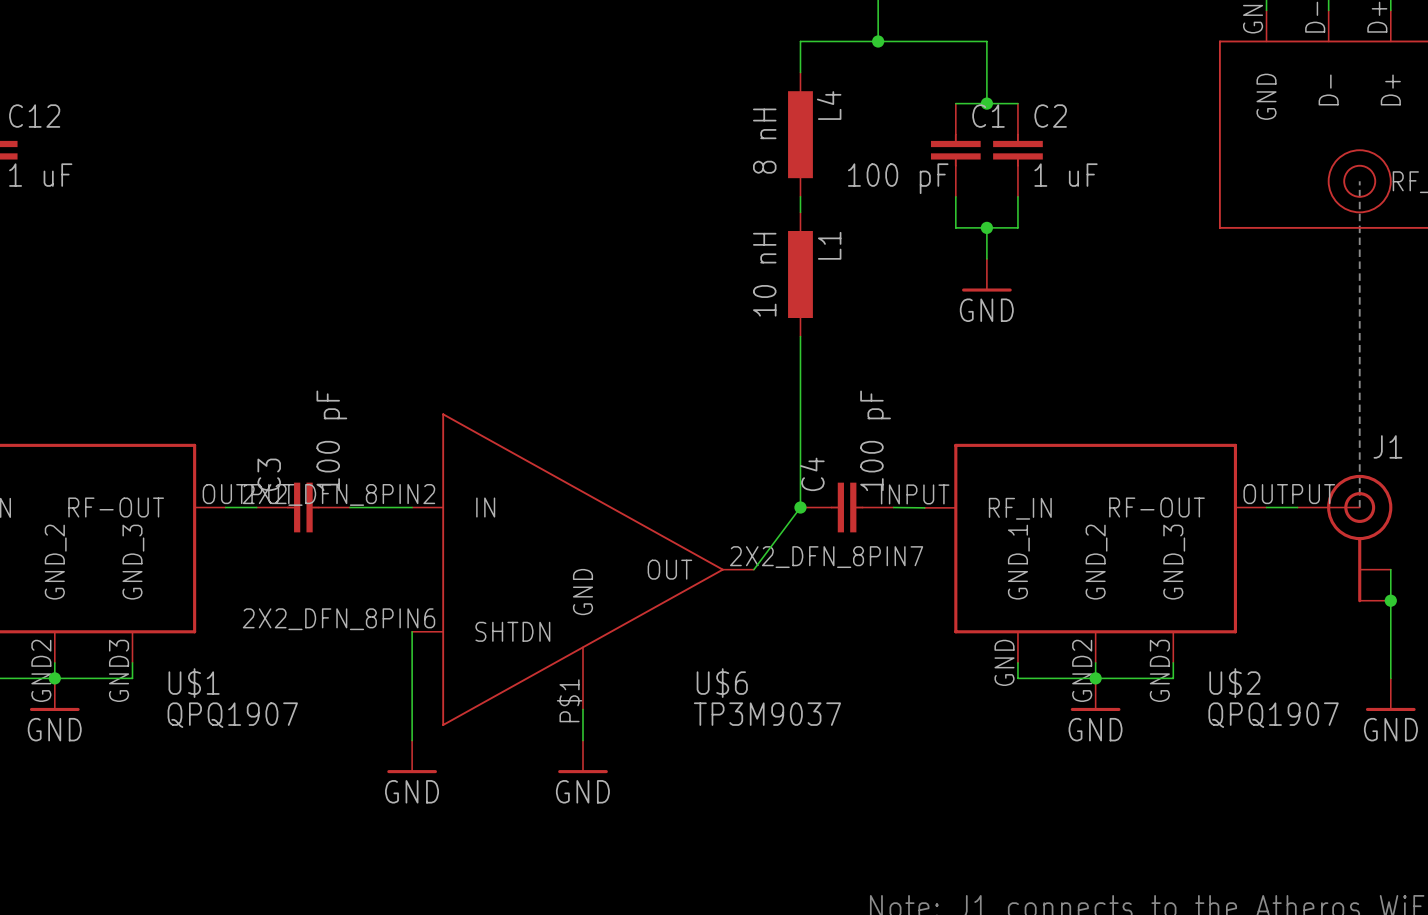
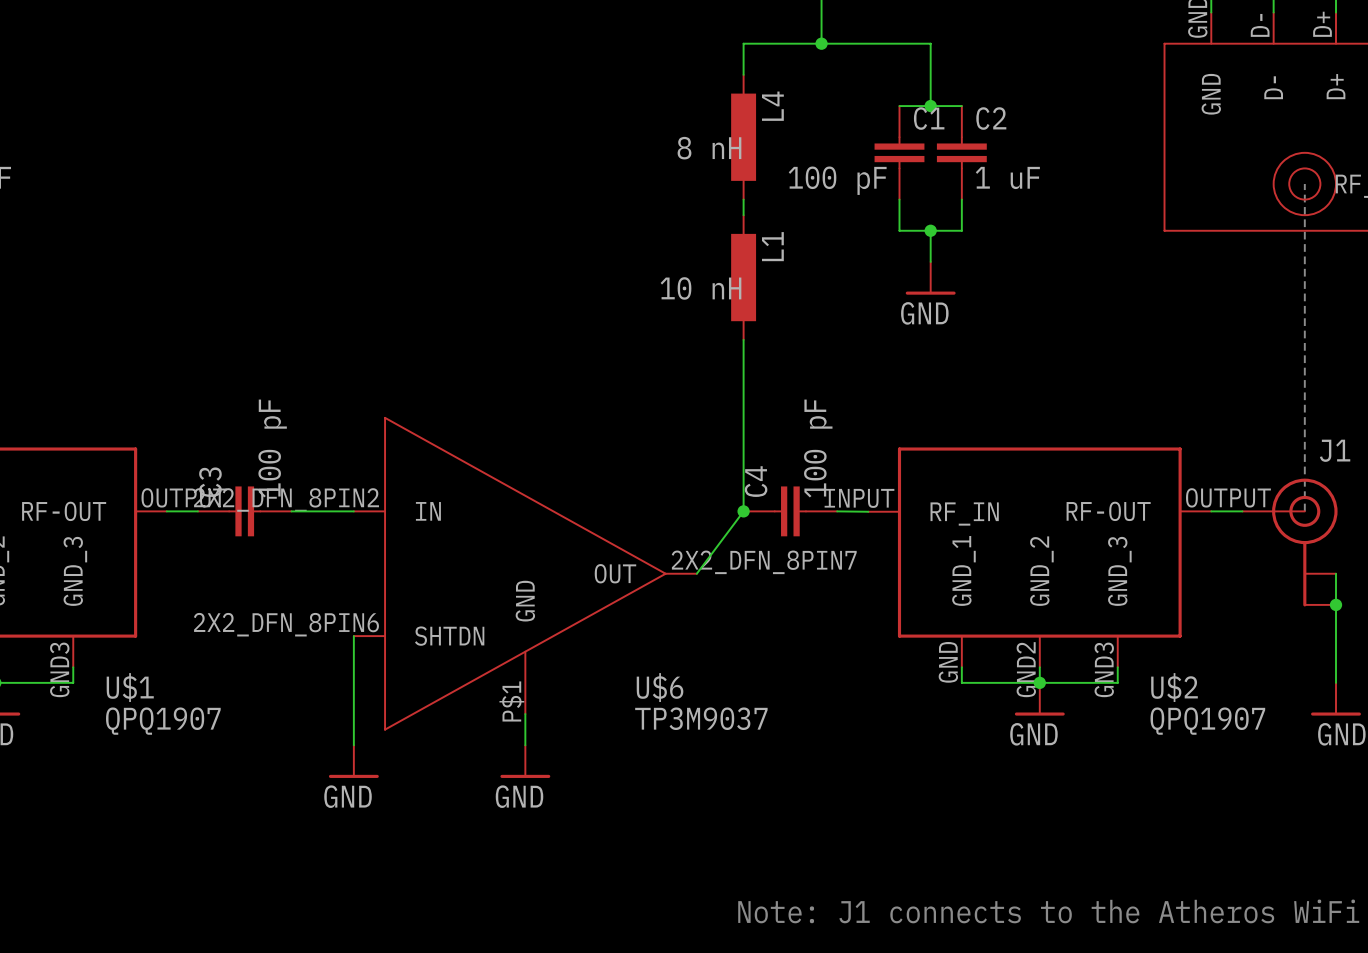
L4 text: 8 nH (764, 141) -> none
L4 text: none -> 8 nH (709, 148)
L1 text: 10 nH (764, 274) -> none
L1 text: none -> 10 nH (701, 288)

